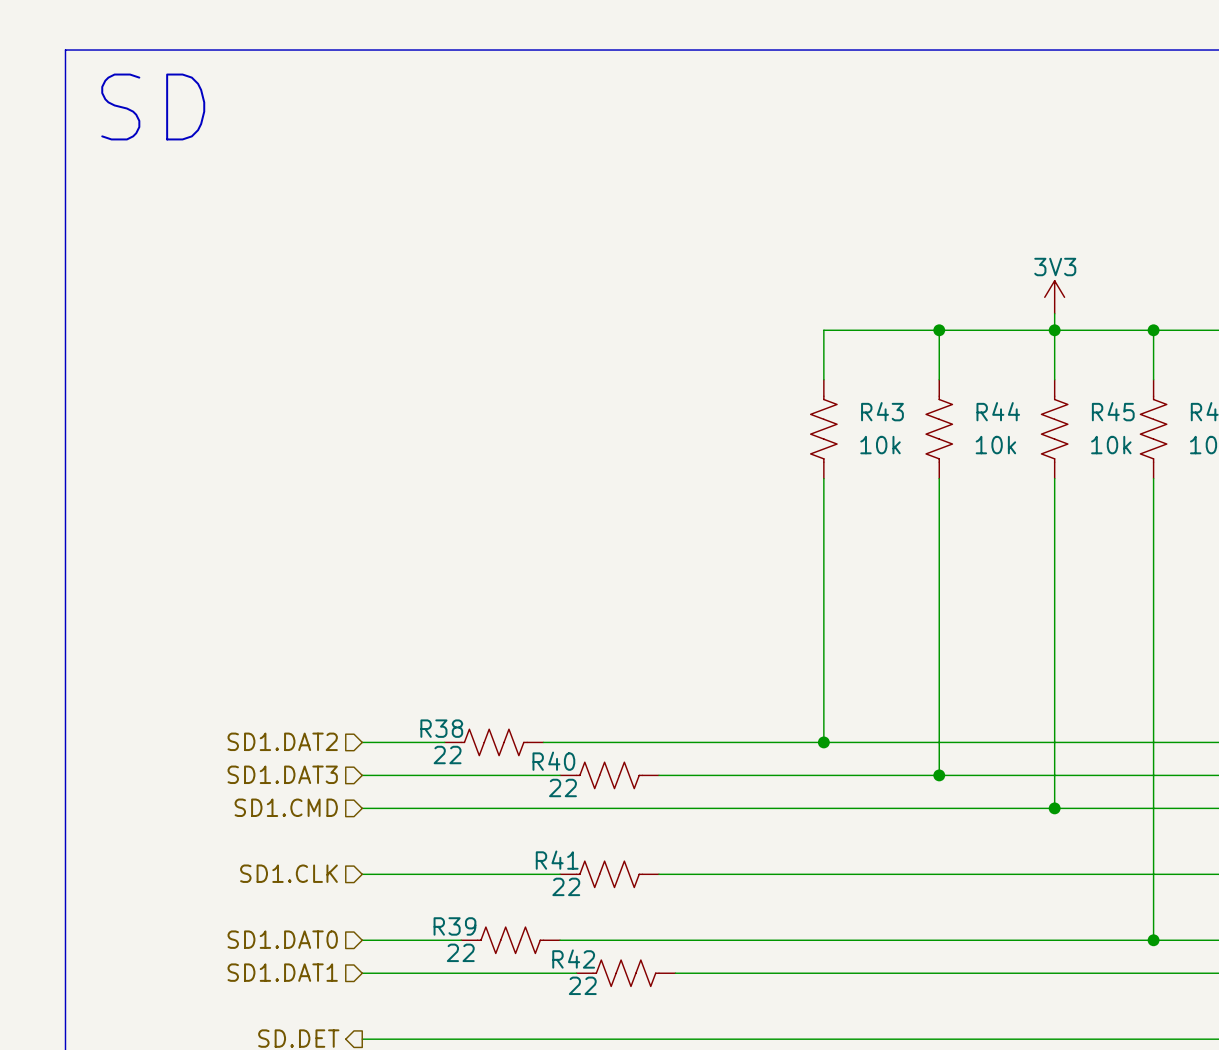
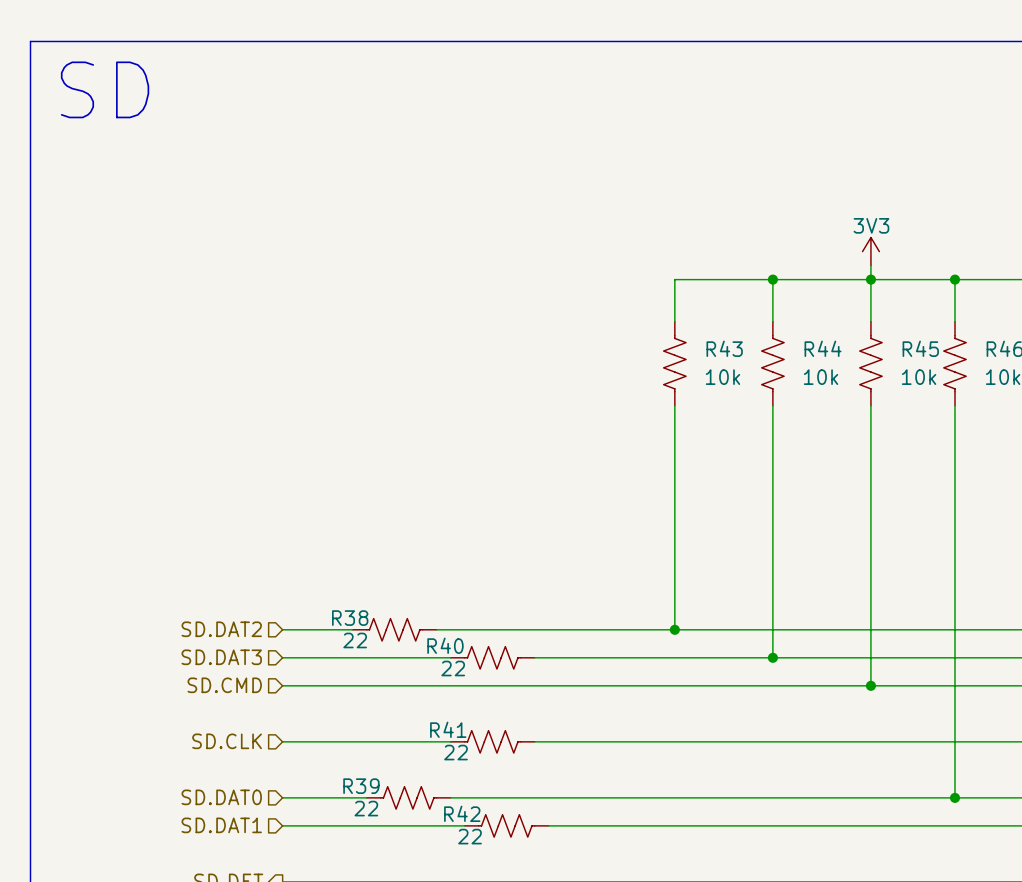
hierarchical label: SD1.DAT2 (282, 741) -> SD.DAT2 (221, 629)
hierarchical label: SD1.DAT3 (282, 774) -> SD.DAT3 (221, 657)
hierarchical label: SD1.CMD (286, 807) -> SD.CMD (224, 685)
hierarchical label: SD1.CLK (288, 873) -> SD.CLK (227, 741)
hierarchical label: SD1.DAT0 (282, 939) -> SD.DAT0 (221, 797)
hierarchical label: SD1.DAT1 (282, 972) -> SD.DAT1 (221, 825)

